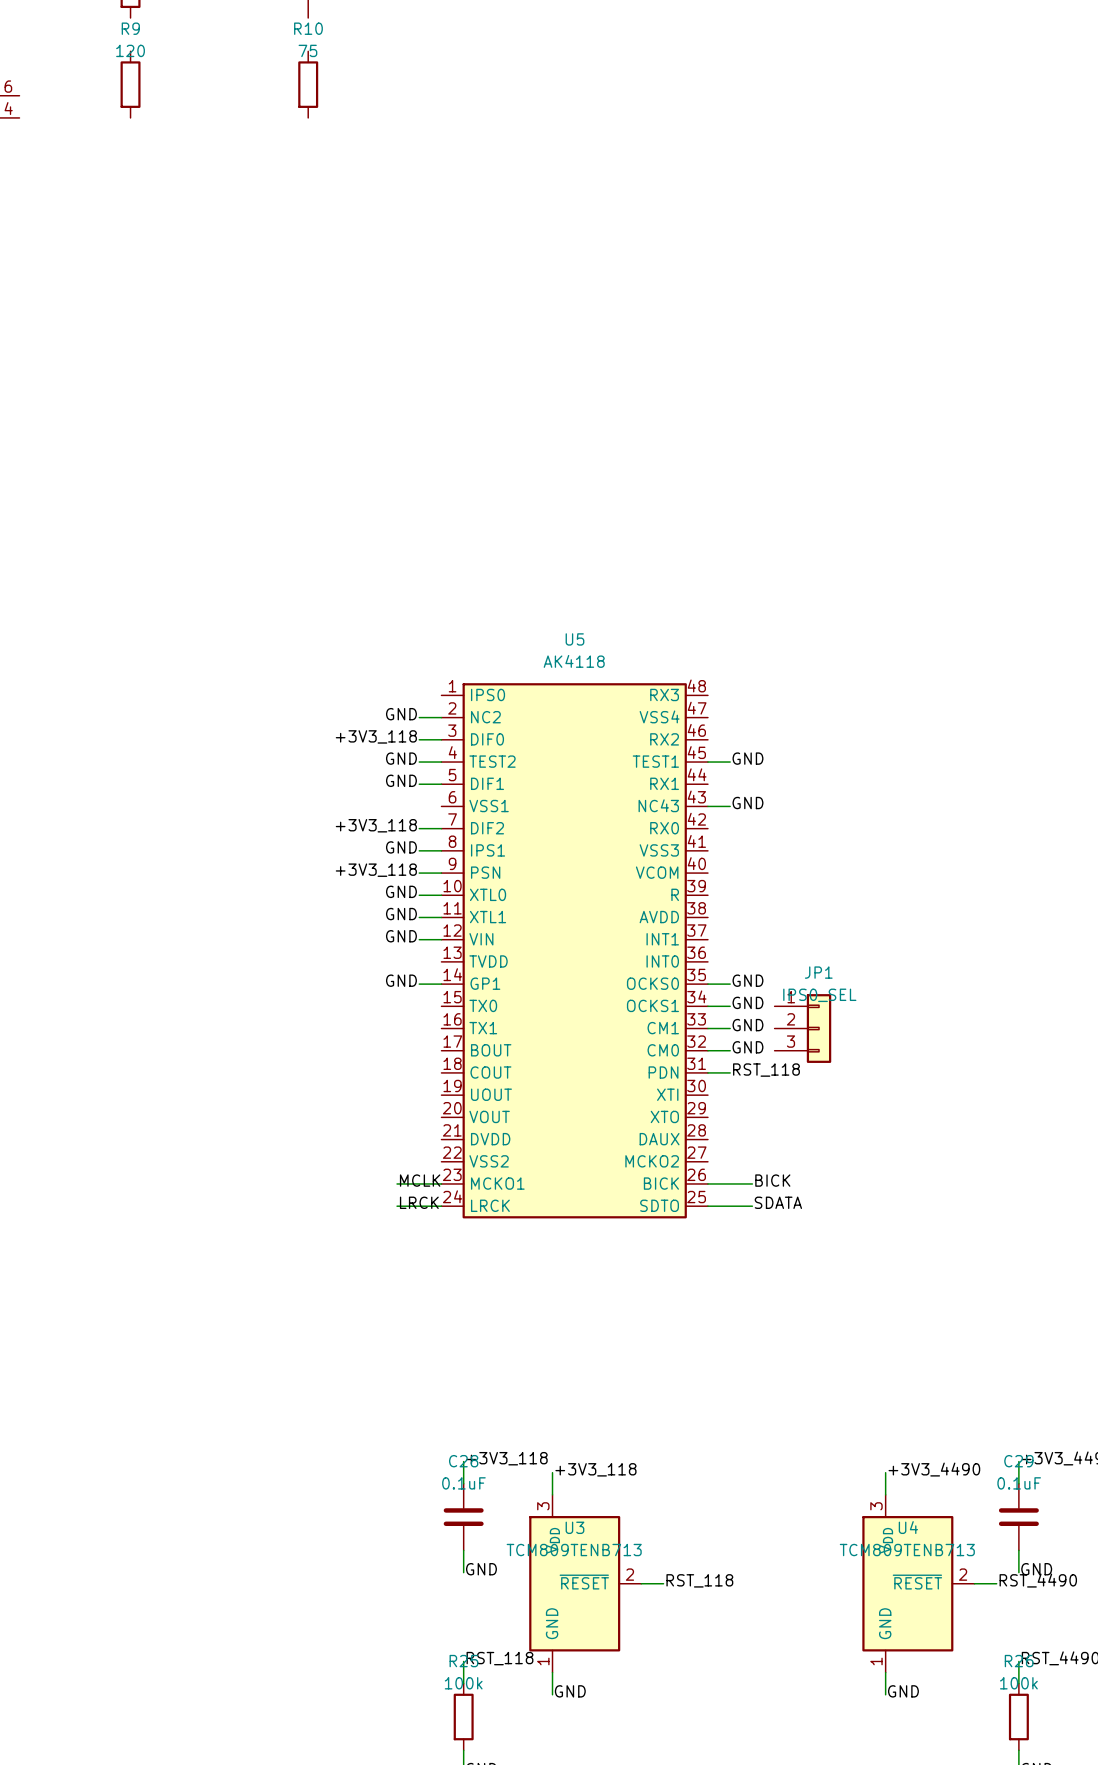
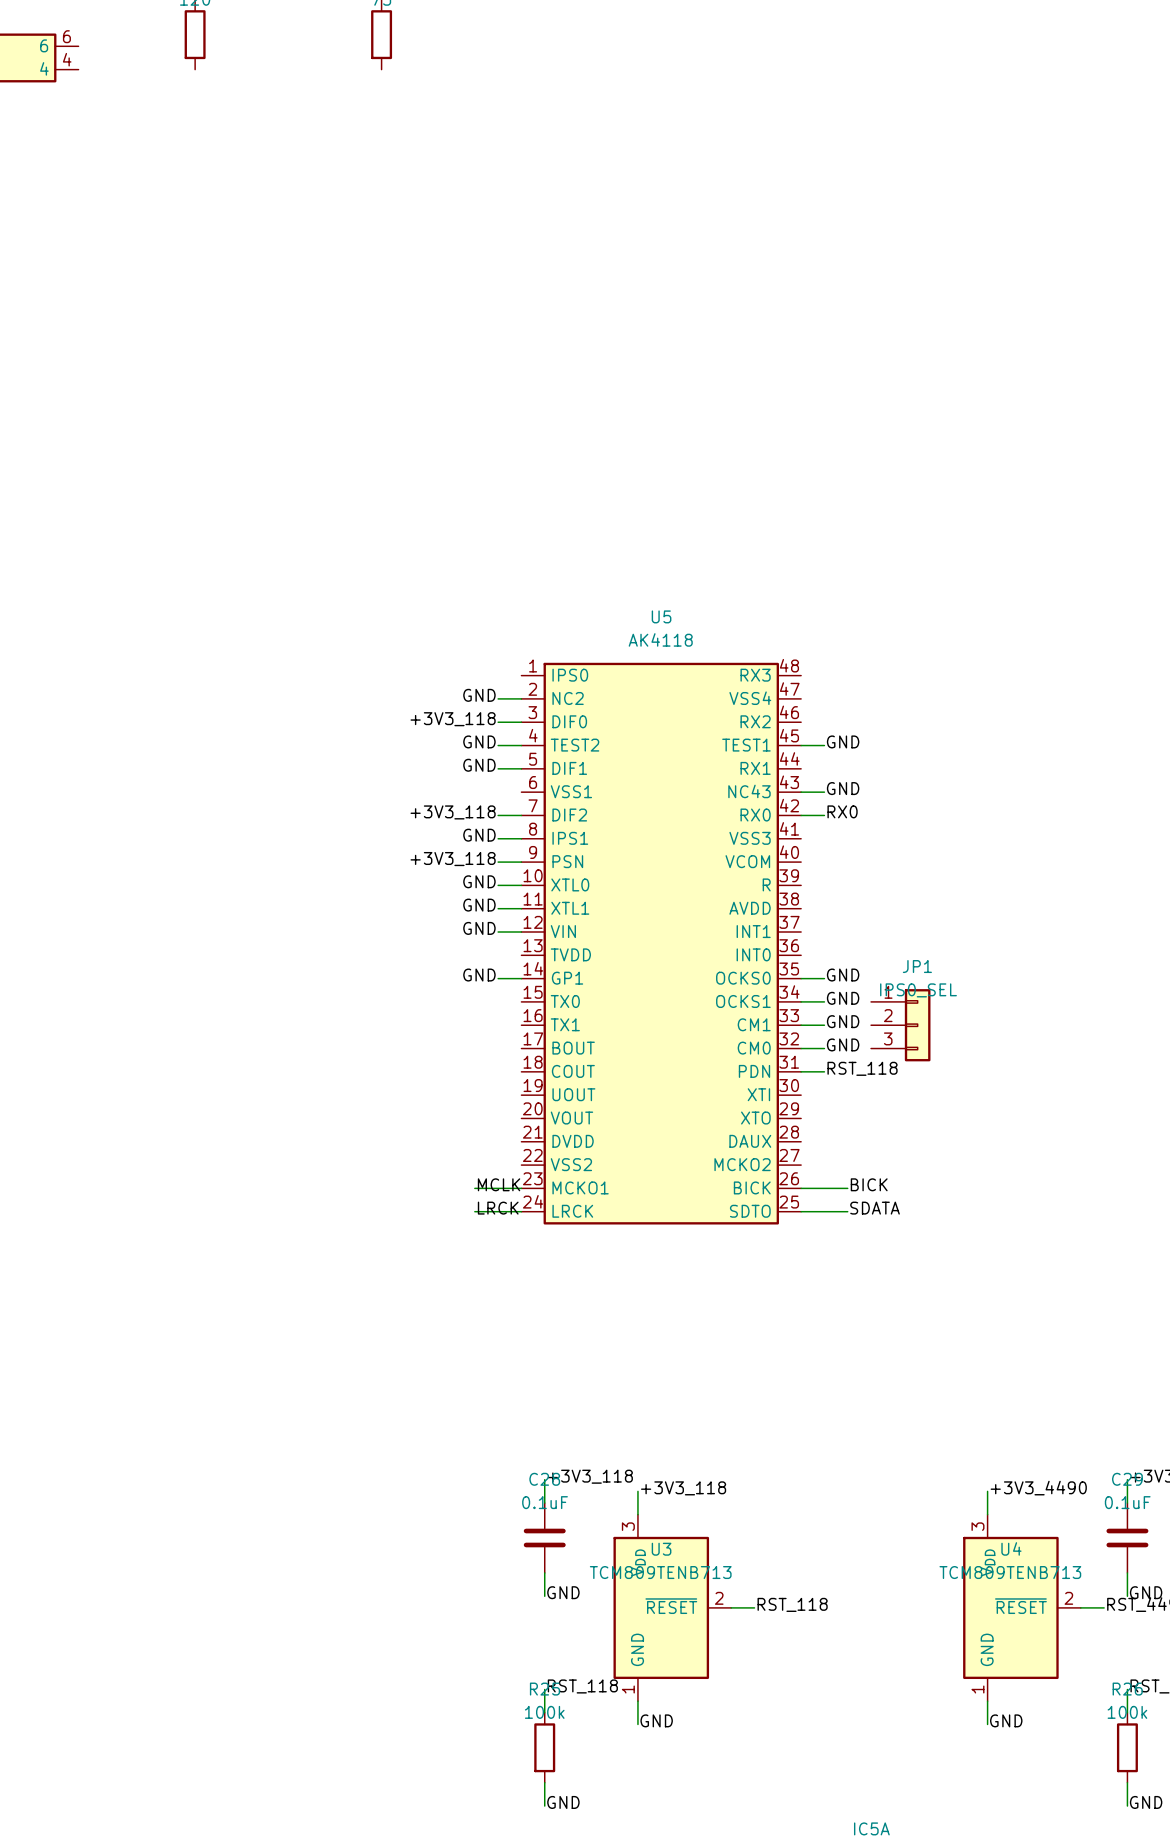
label: none -> RX0 (842, 811)
wire: none -> (801, 815) (824, 815)

